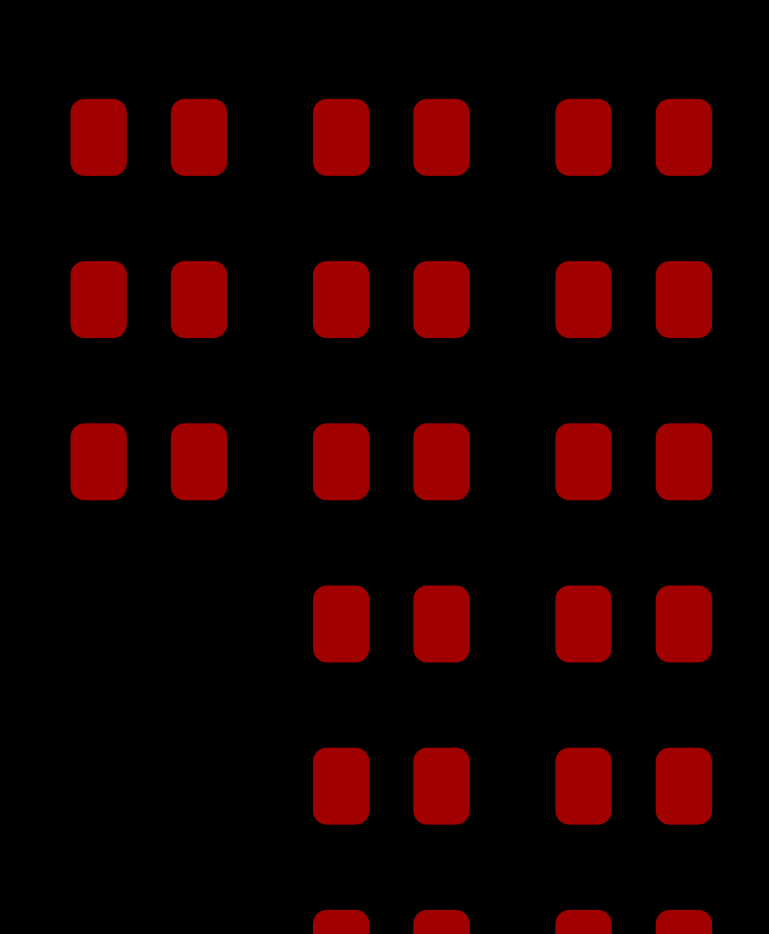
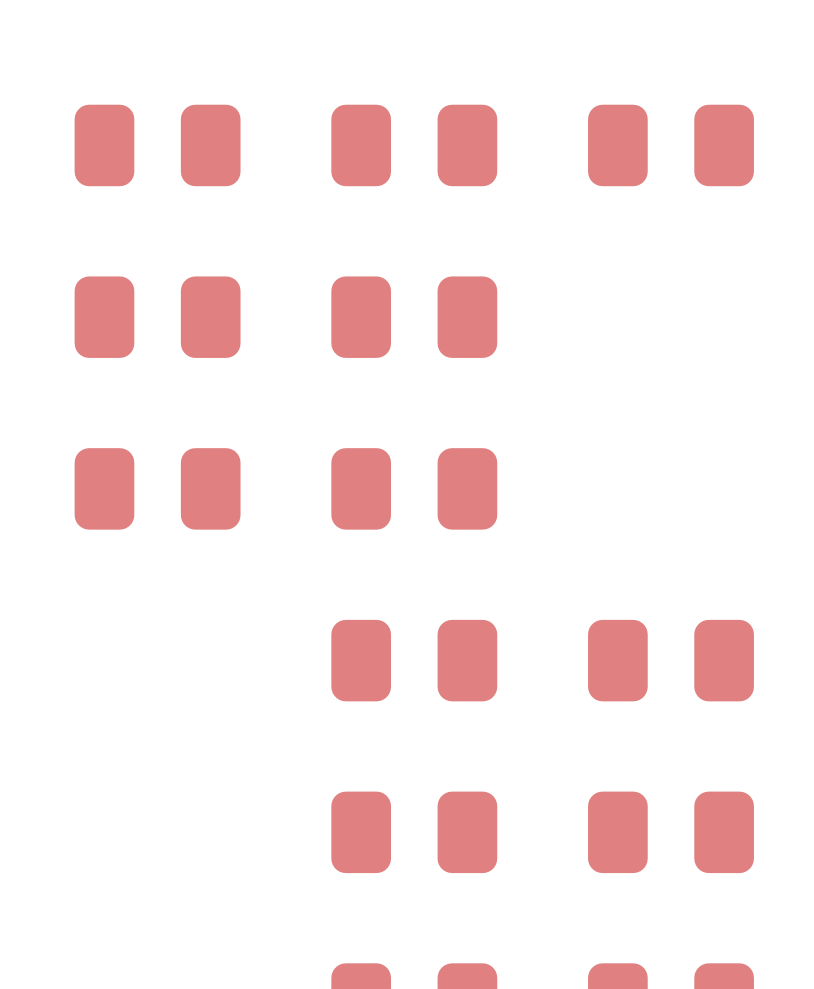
part: (633, 299) -> none
part: (633, 461) -> none

